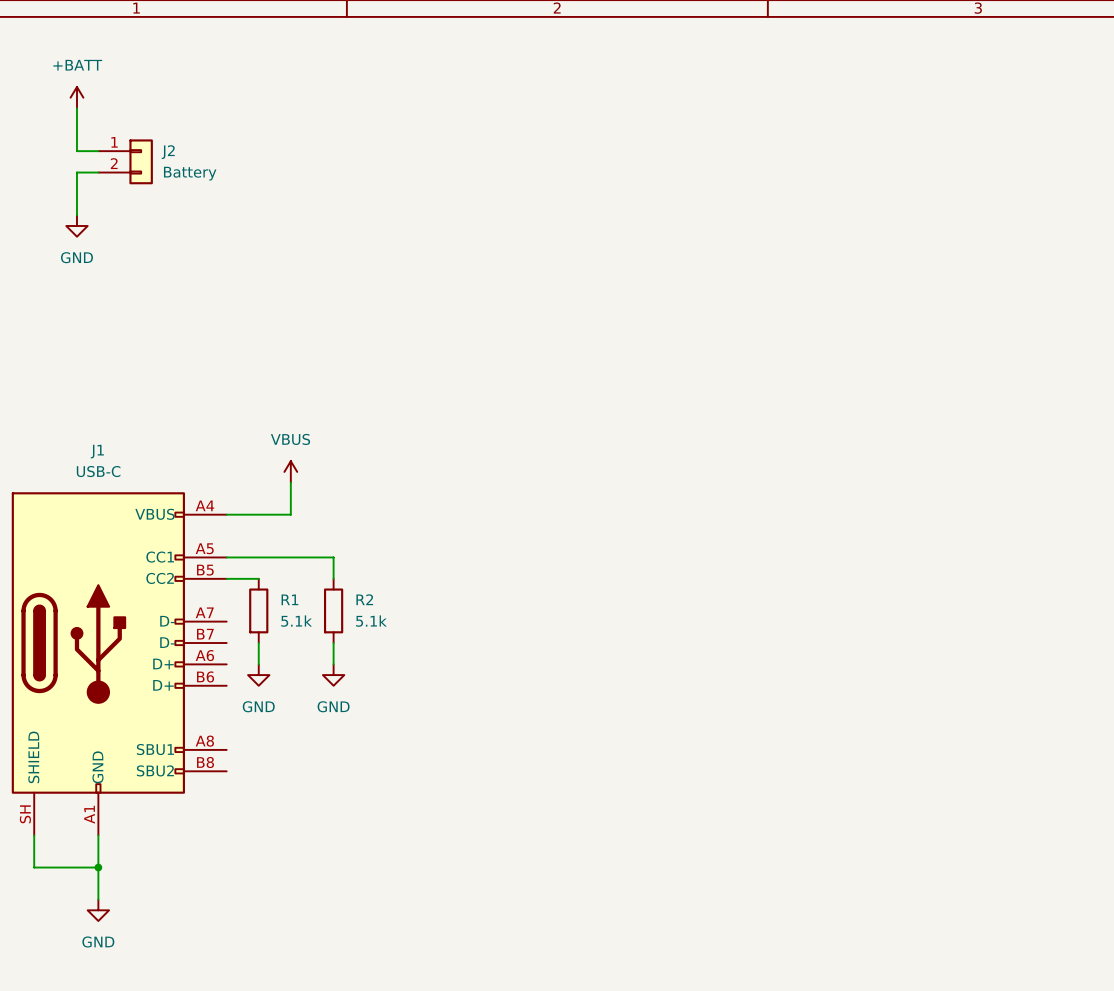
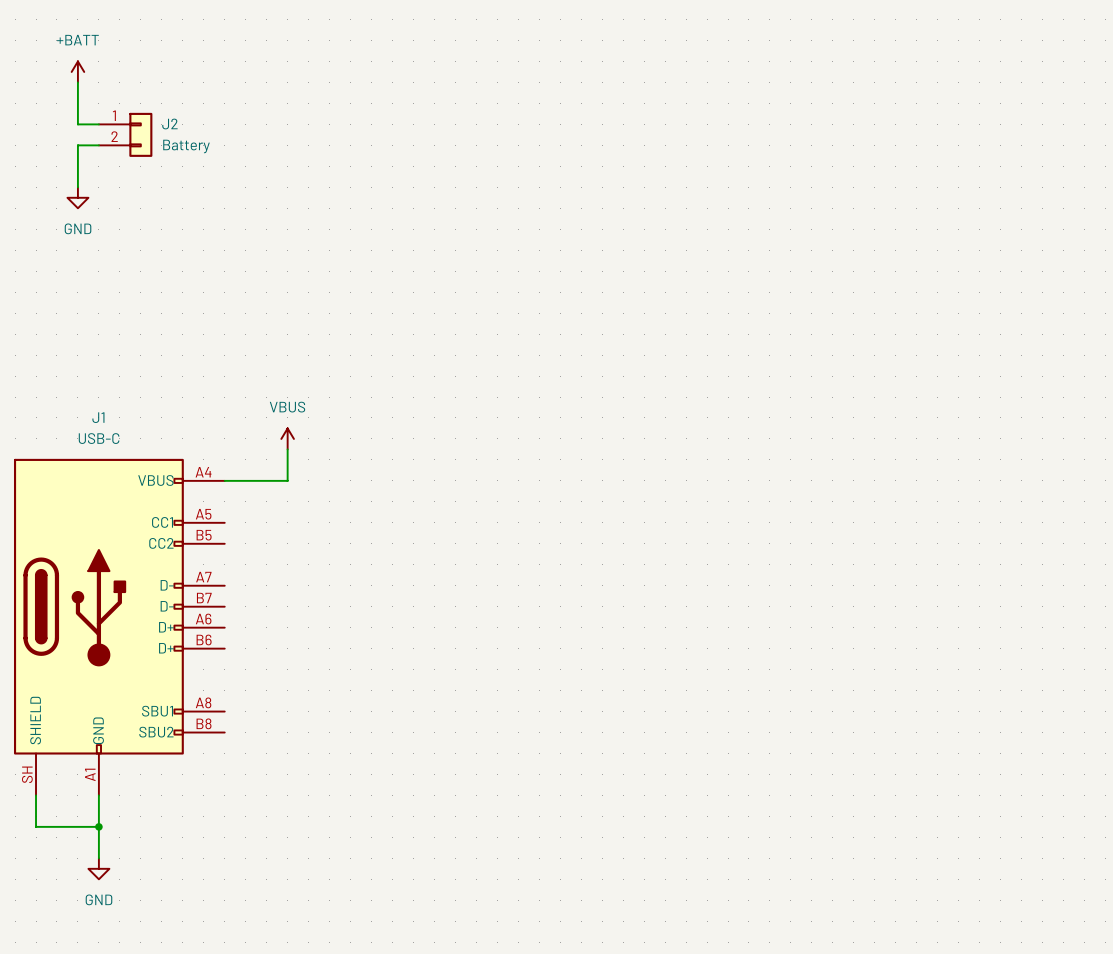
wire: (226, 557) (333, 557) (333, 578) -> none
wire: (226, 578) (258, 578) -> none
R1: 5.1k (258, 610) -> none
R2: 5.1k (333, 610) -> none
wire: (258, 643) (258, 664) -> none
wire: (333, 643) (333, 664) -> none
power symbol: GND (258, 675) -> none
power symbol: GND (333, 675) -> none

